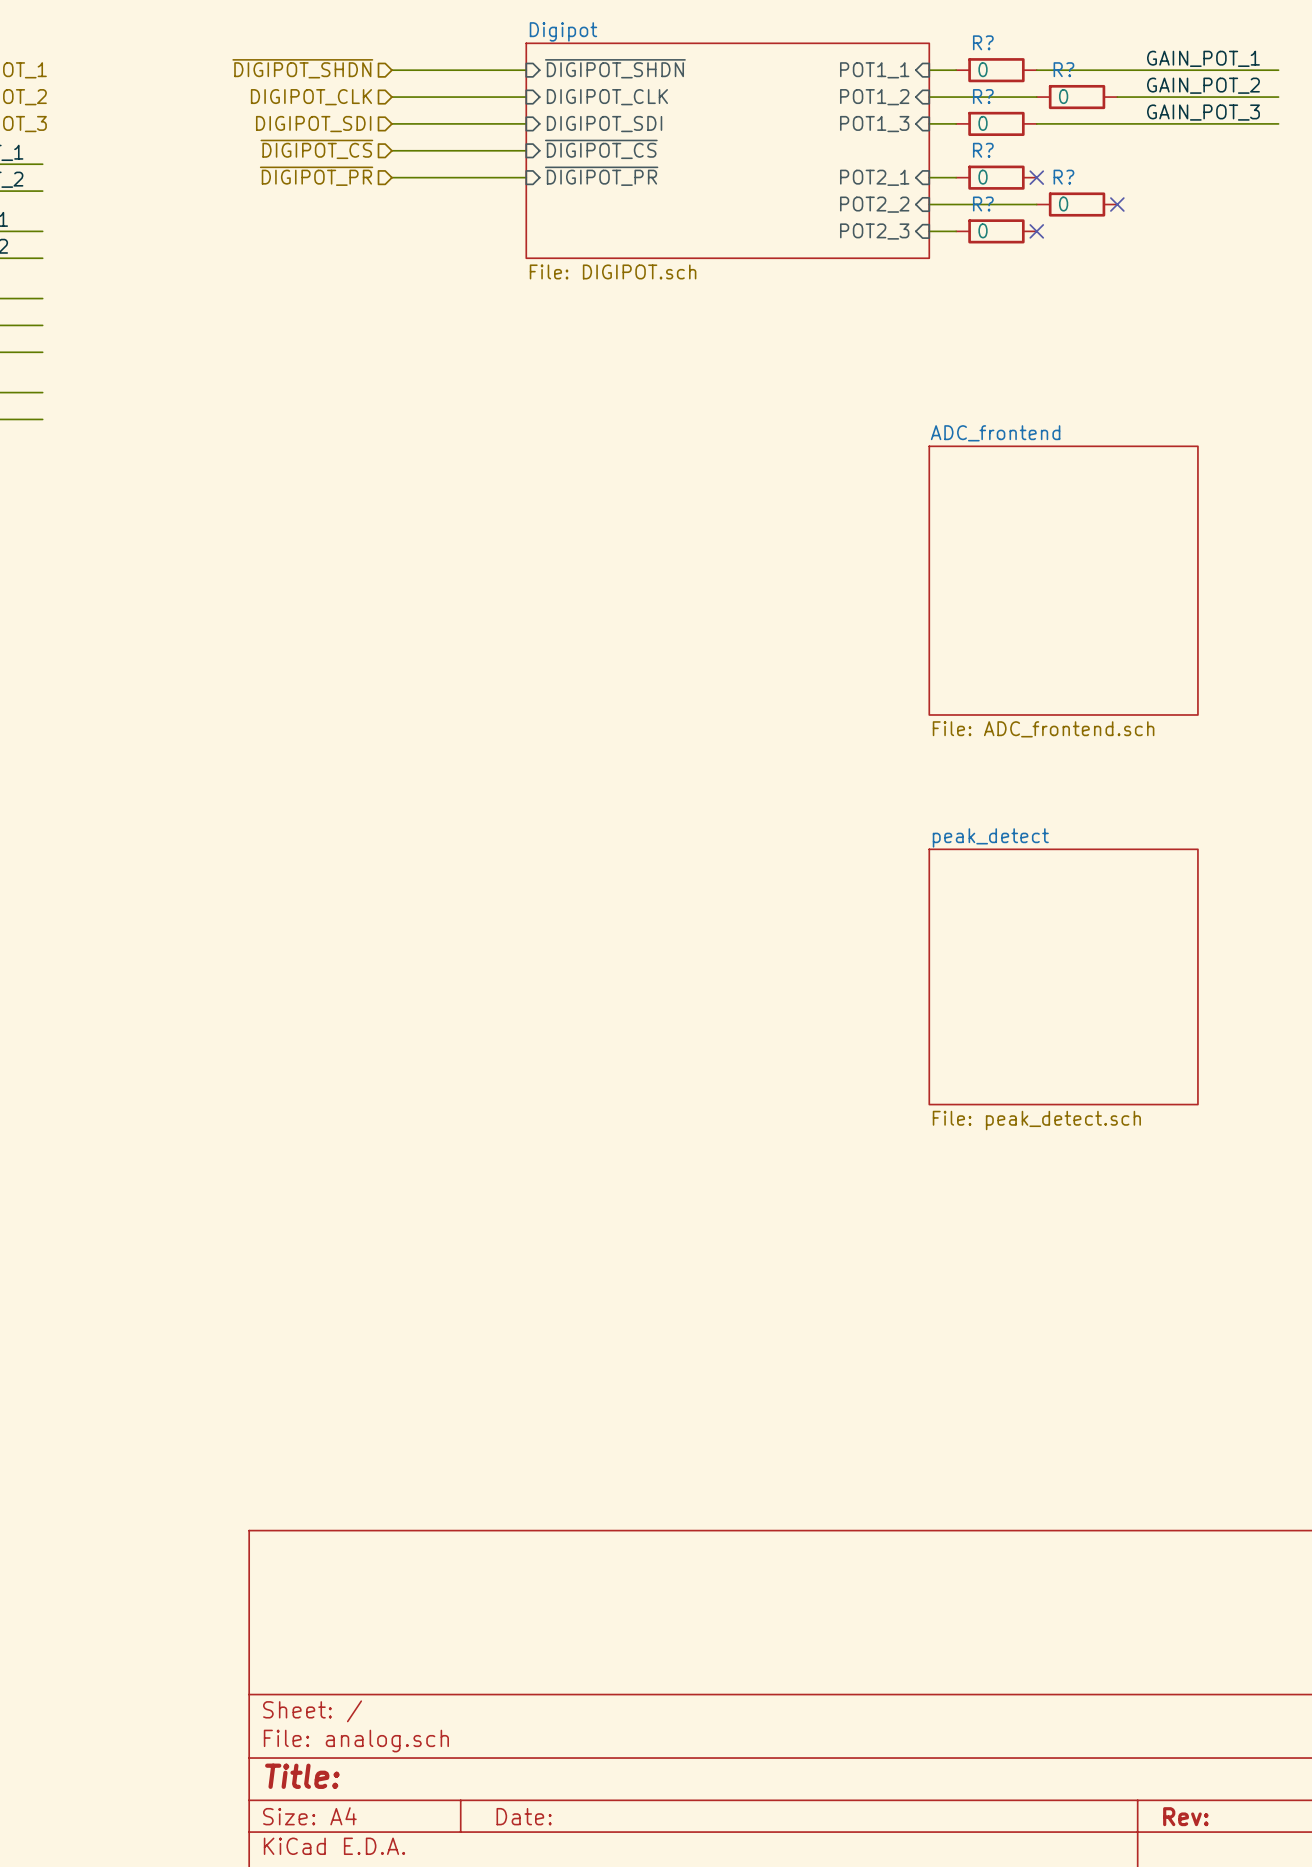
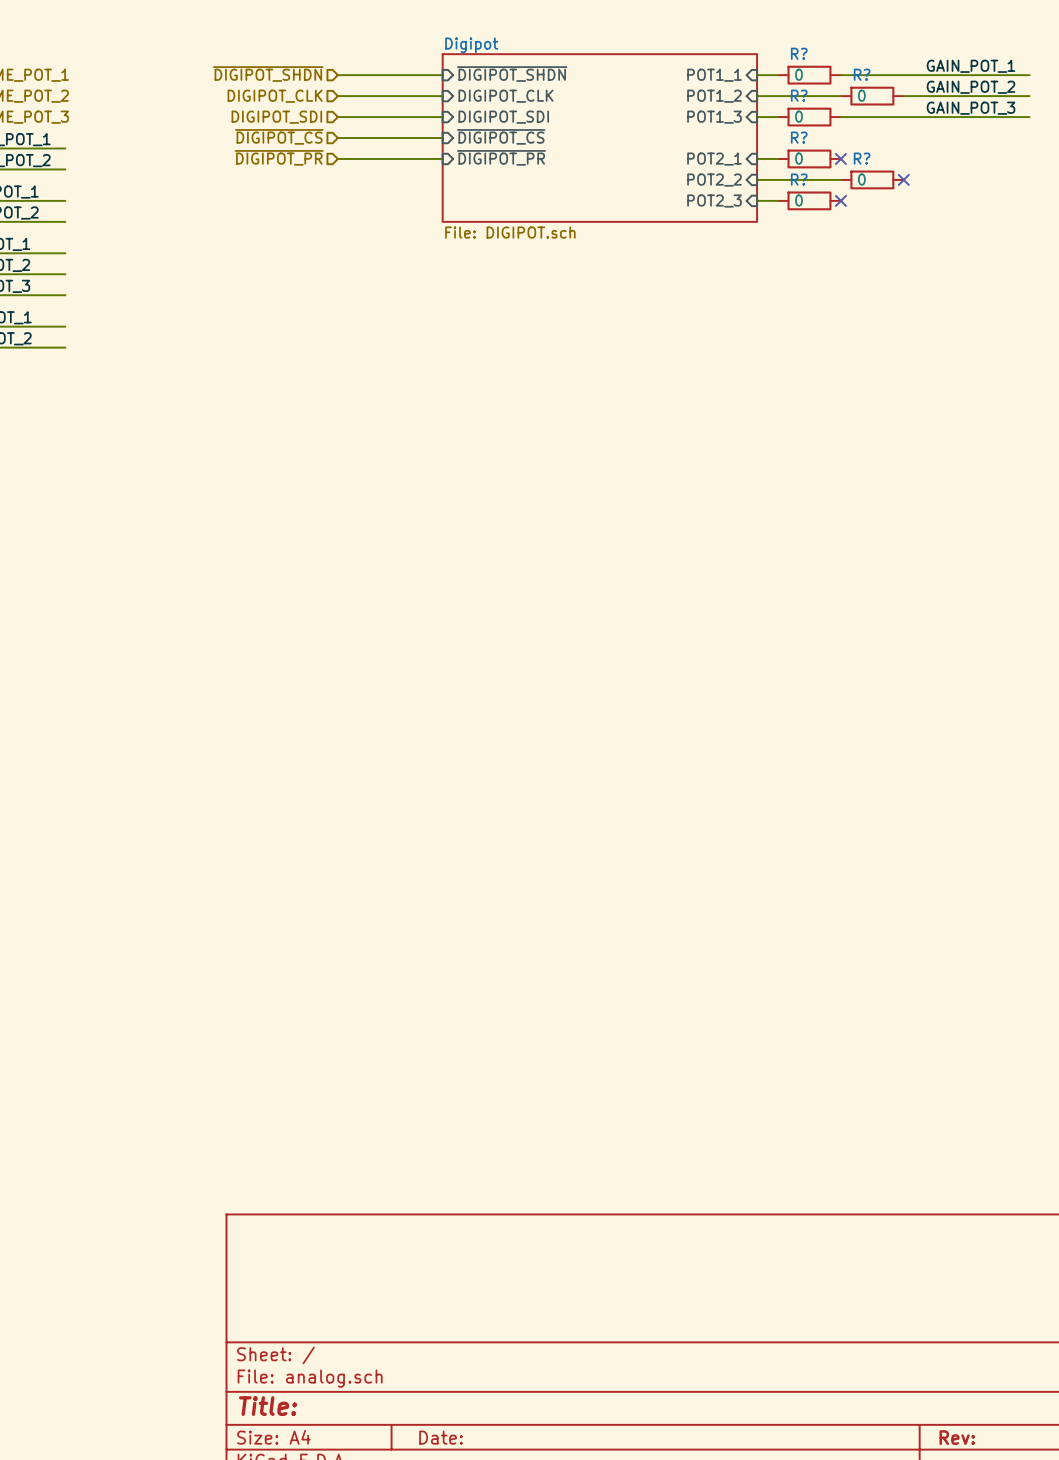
sheet ADC_frontend: File: ADC_frontend.sch (1063, 580) -> none
sheet peak_detect: File: peak_detect.sch (1063, 976) -> none

